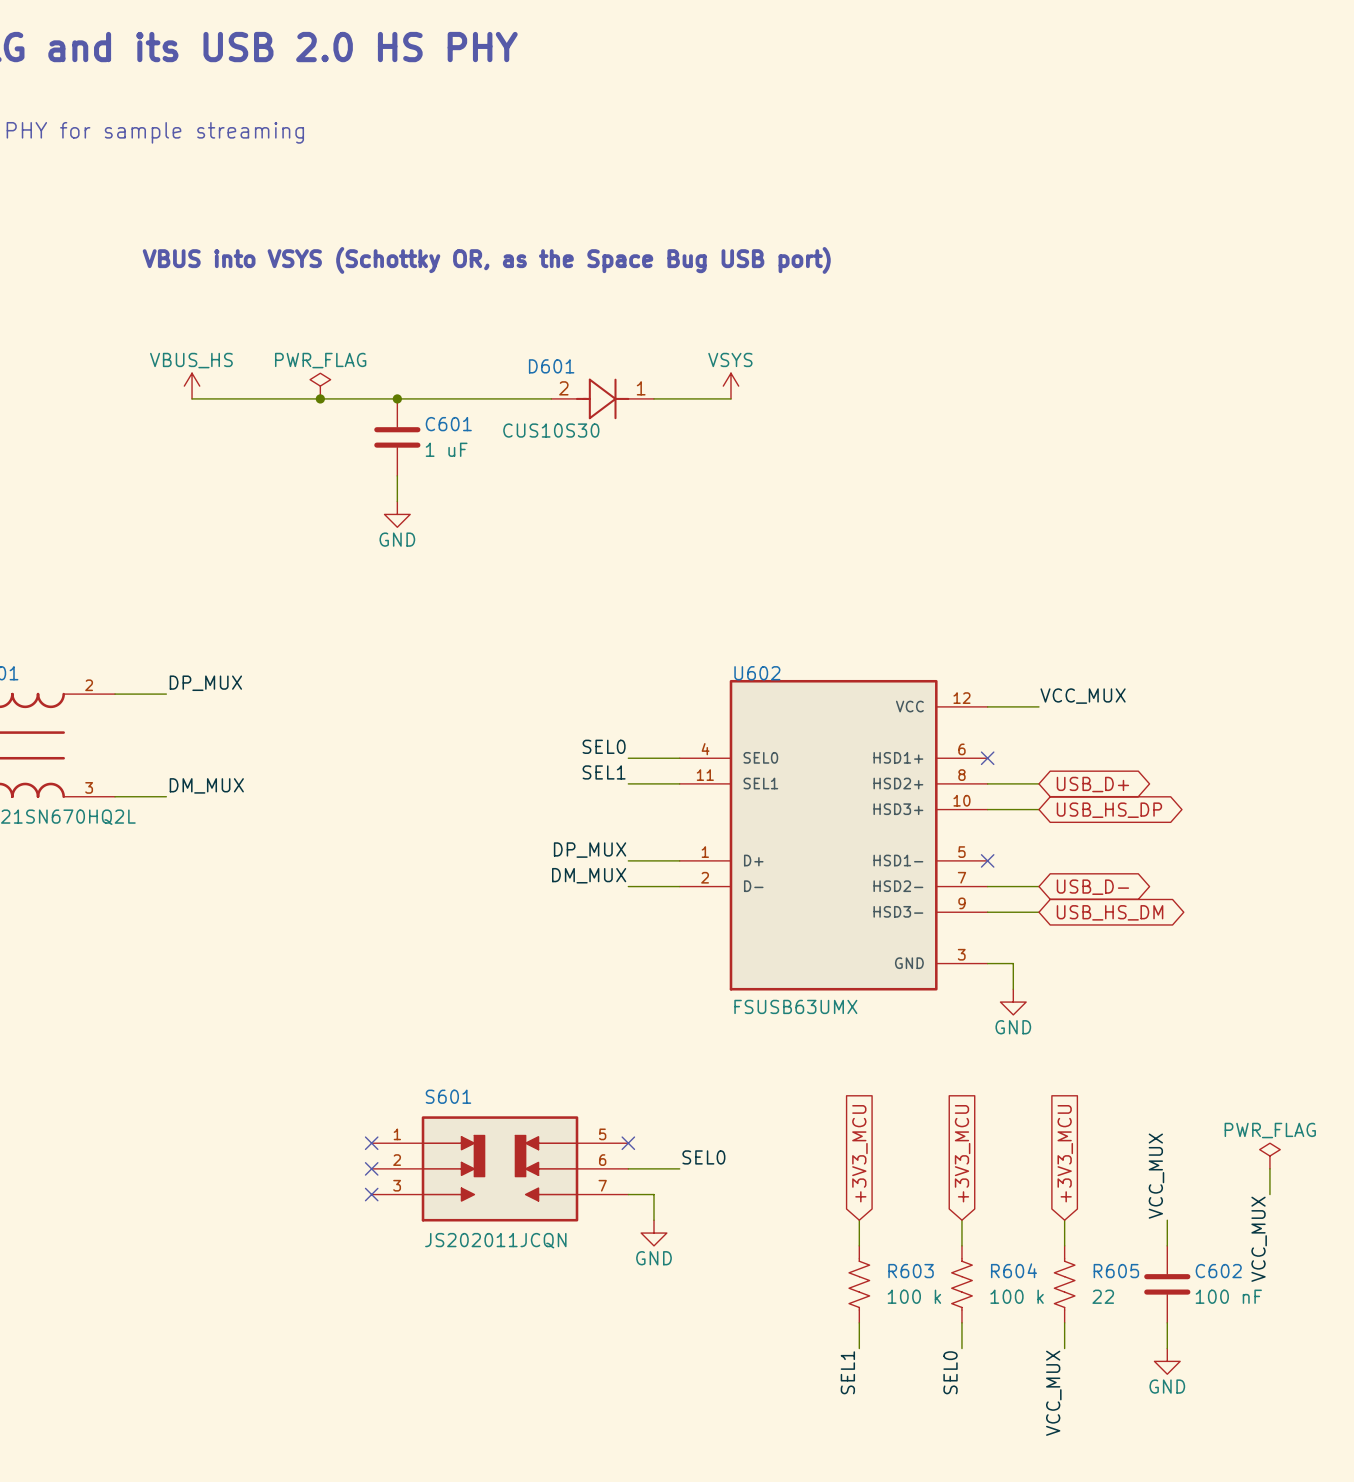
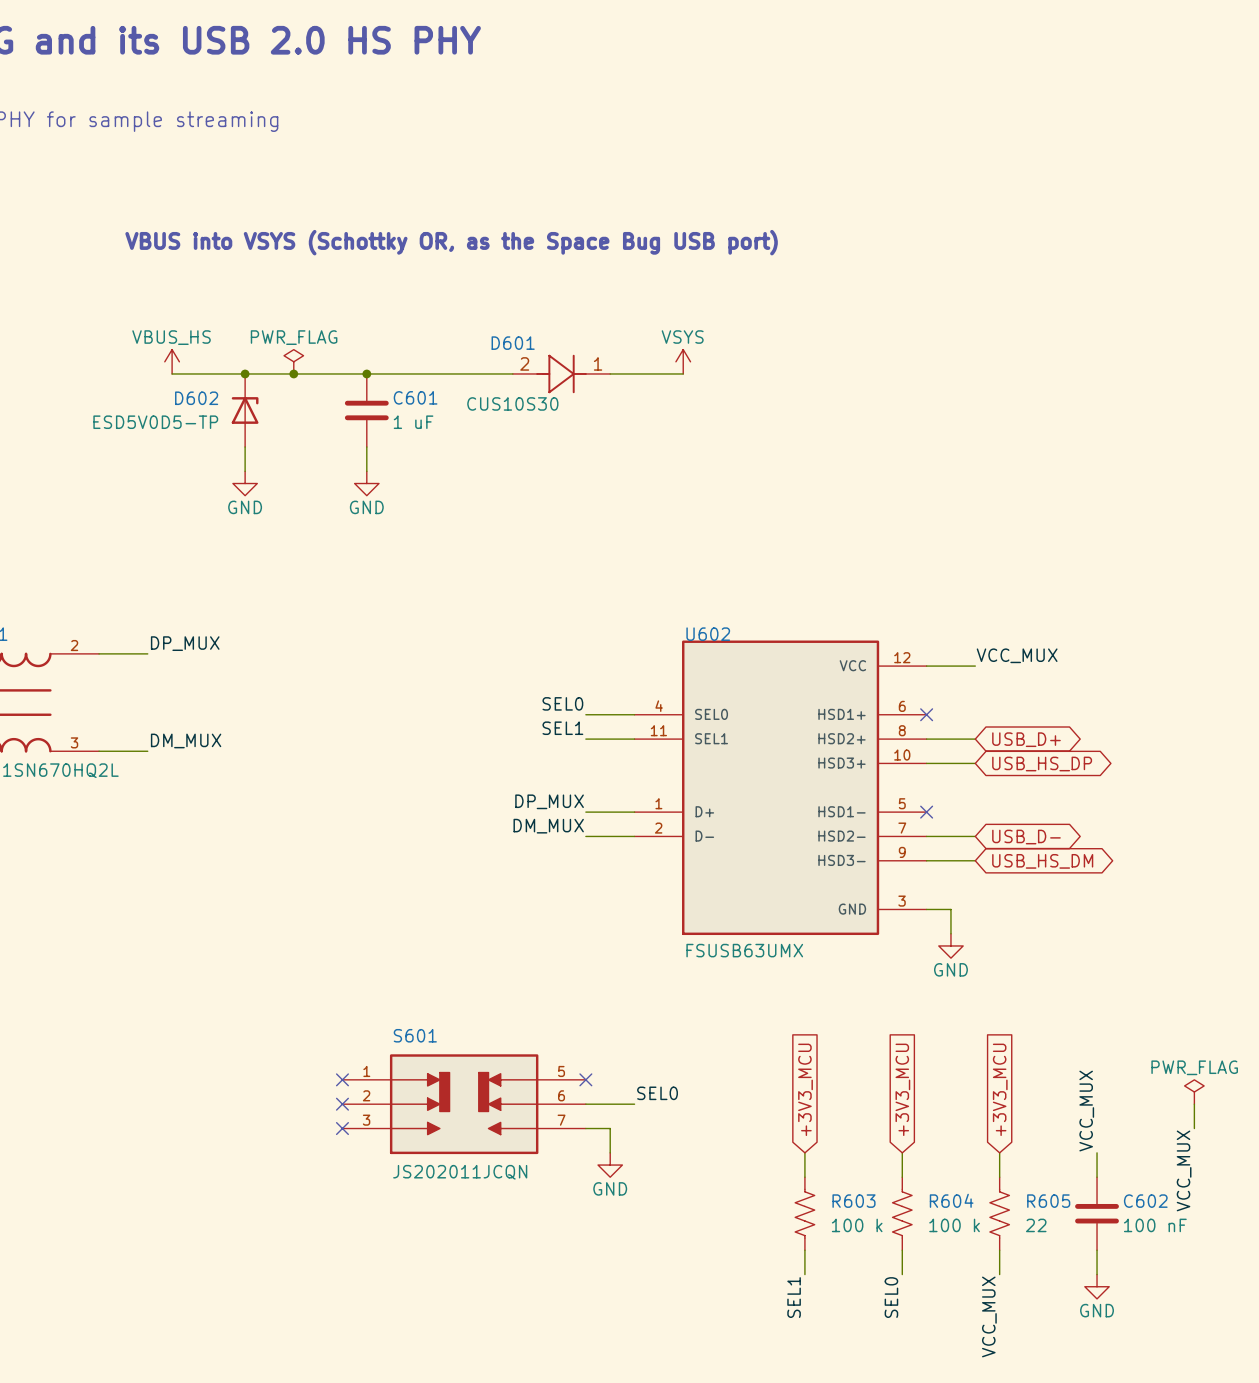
junction: none -> (245, 373)
D602: none -> ESD5V0D5-TP (245, 410)
wire: none -> (245, 447) (245, 471)
power symbol: none -> GND (245, 483)

